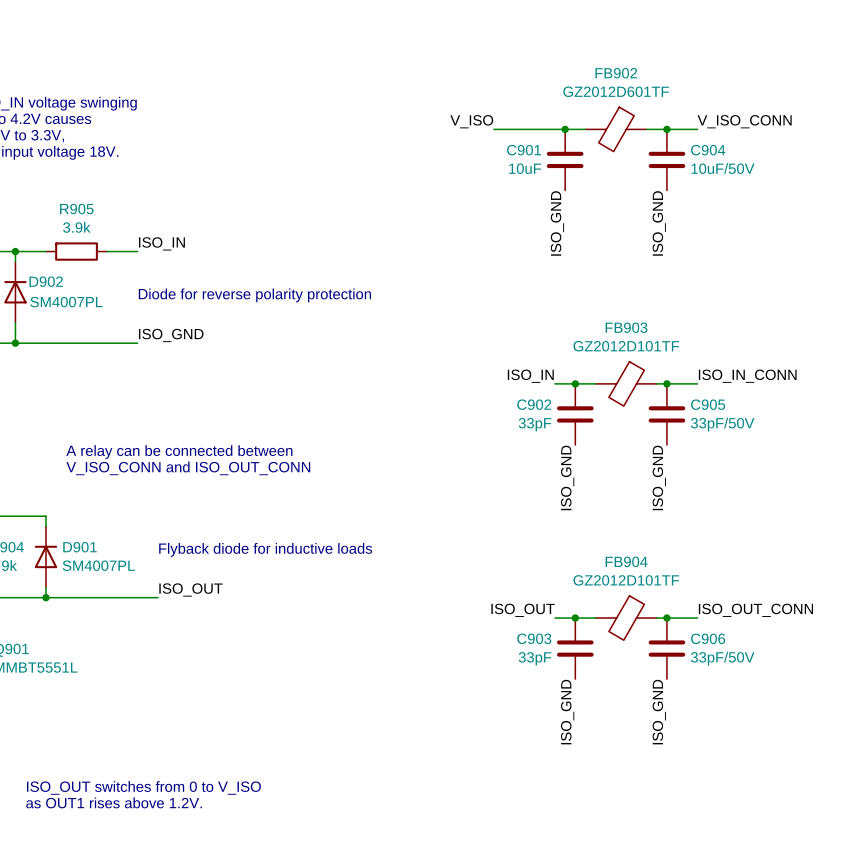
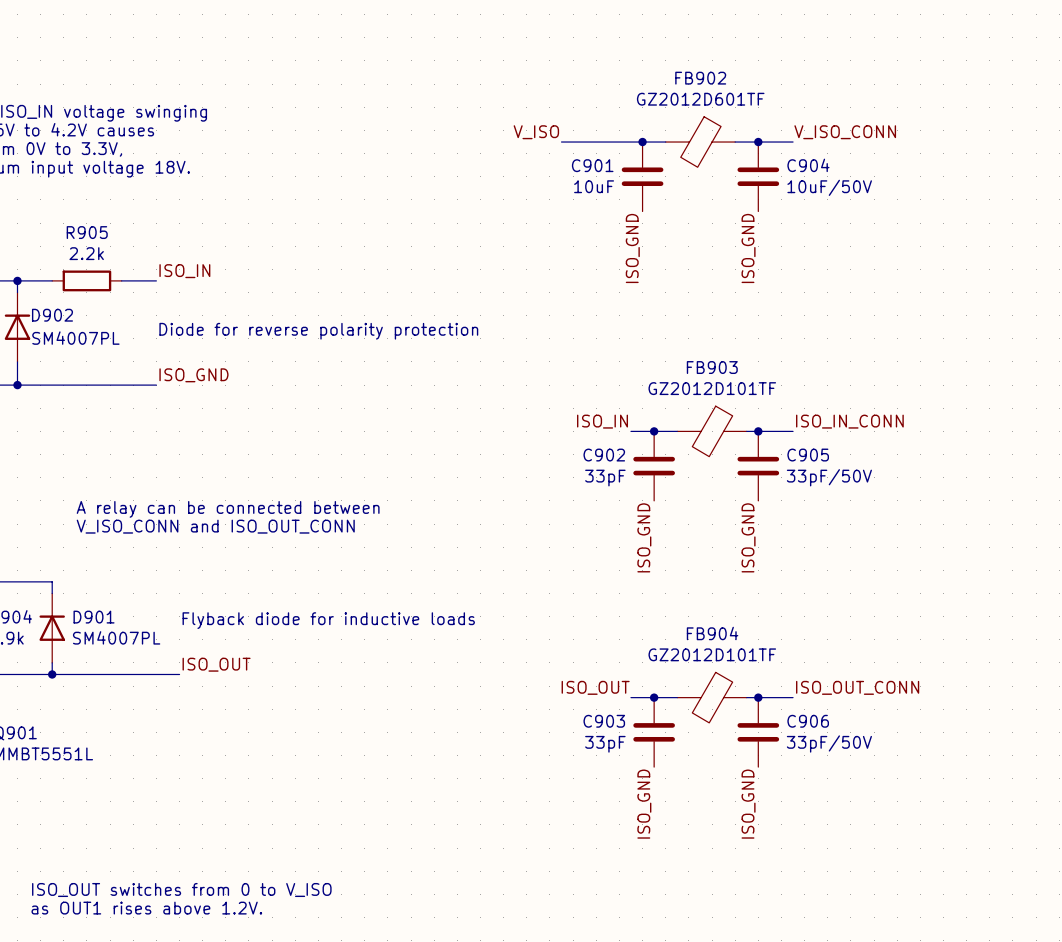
R905 value: 3.9k (76, 227) -> 2.2k (86, 253)

